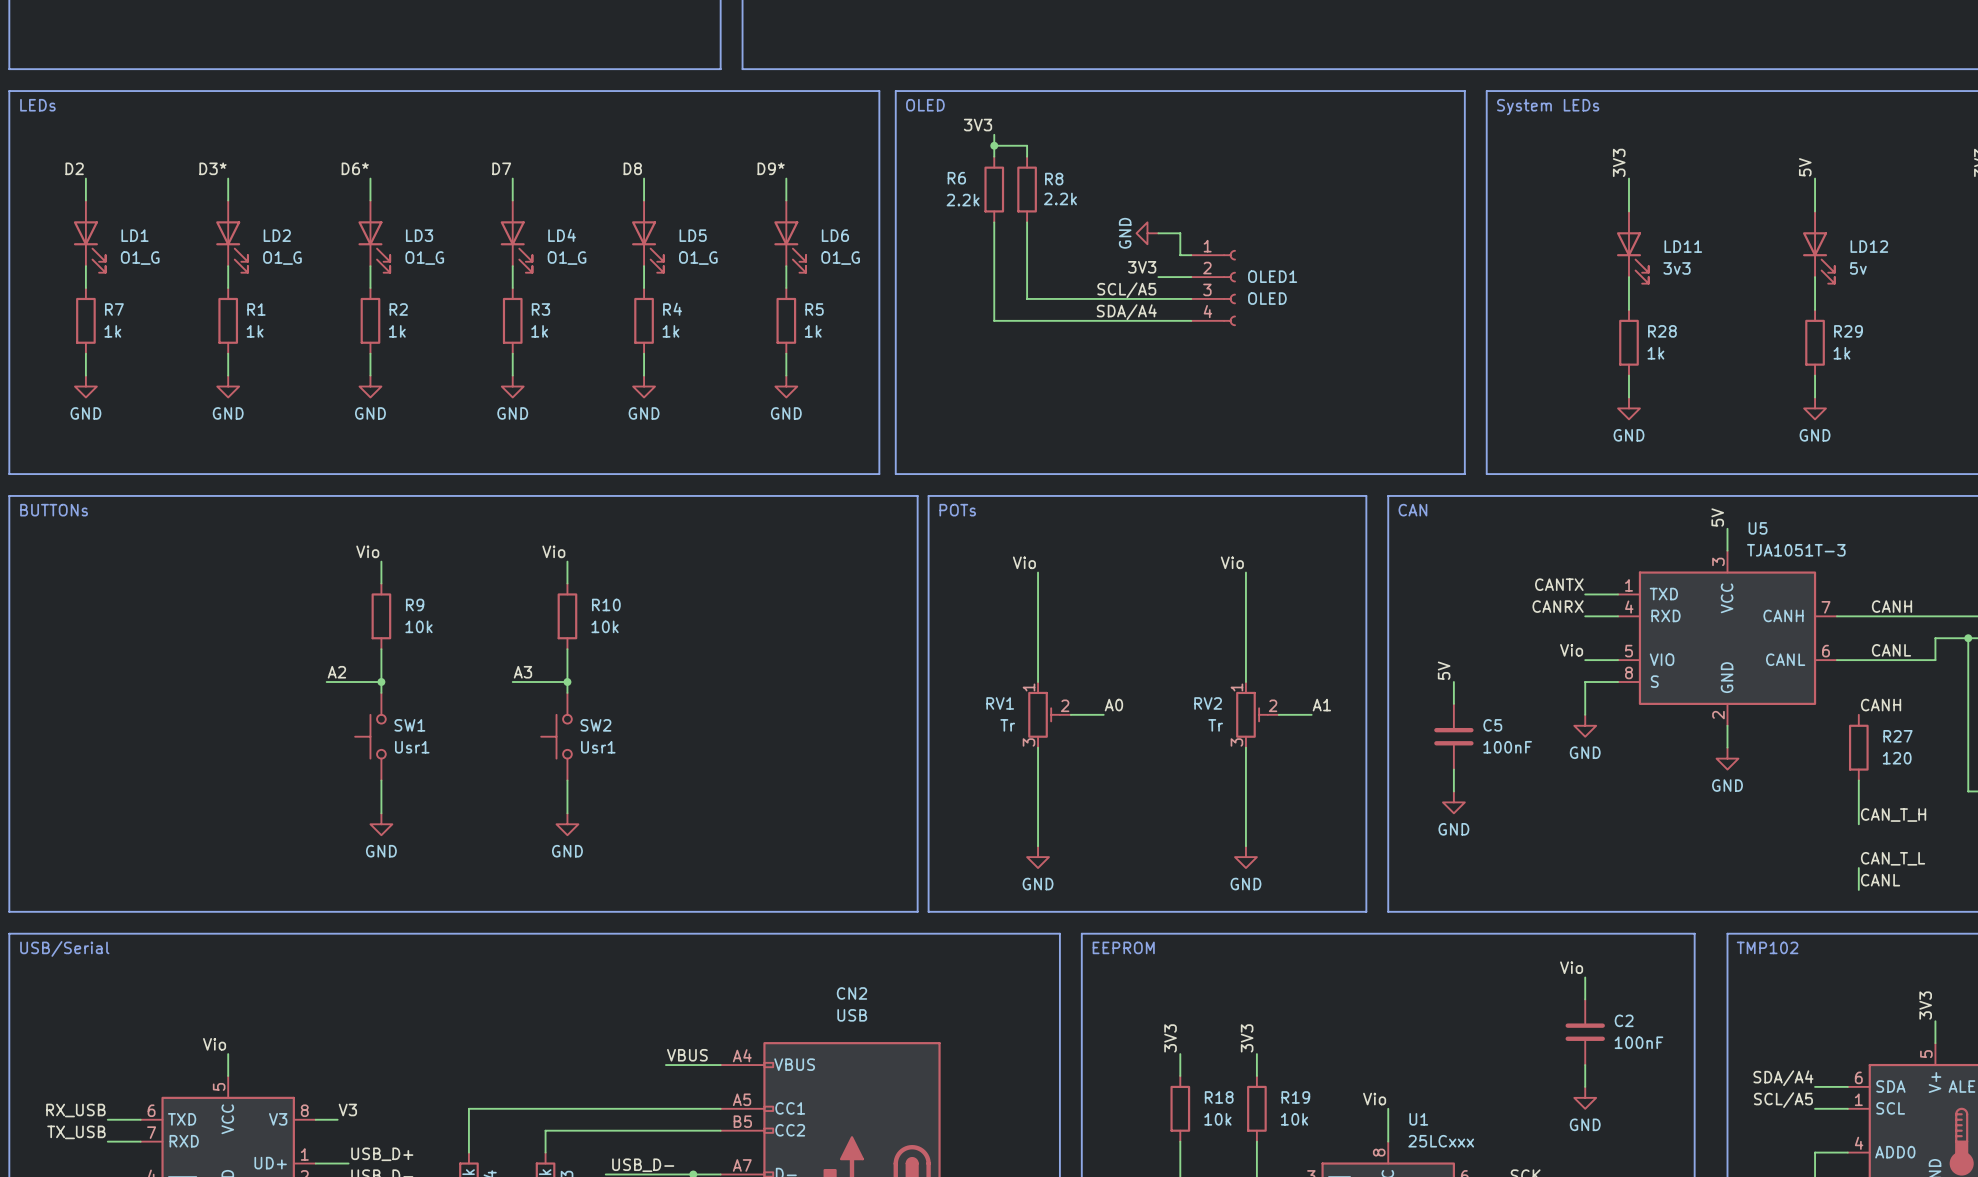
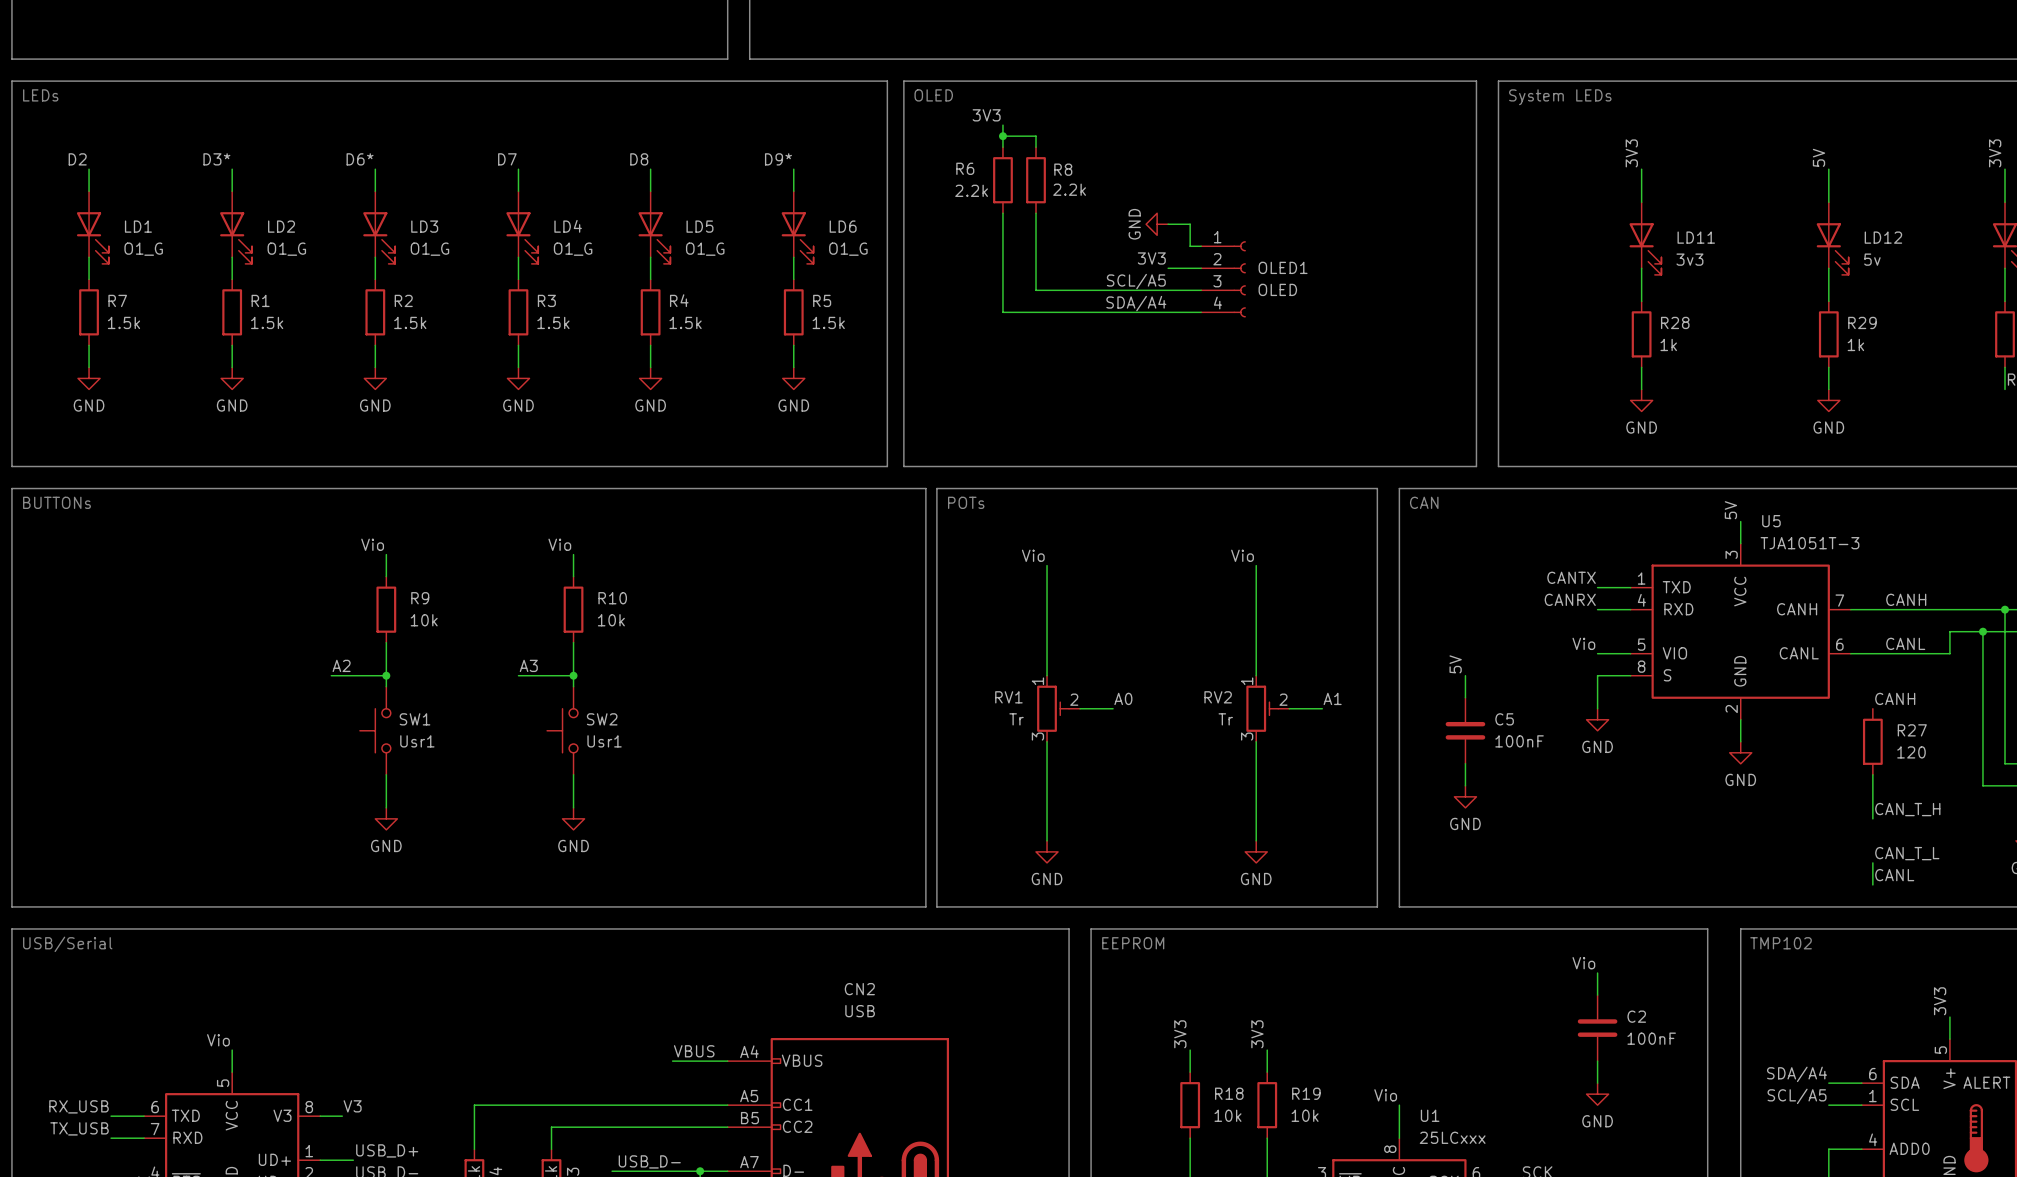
R7 value: 1k (112, 331) -> 1.5k (123, 322)
R1 value: 1k (255, 331) -> 1.5k (267, 322)
R2 value: 1k (397, 331) -> 1.5k (410, 322)
R3 value: 1k (539, 331) -> 1.5k (553, 322)
R4 value: 1k (670, 331) -> 1.5k (685, 322)
R5 value: 1k (813, 331) -> 1.5k (828, 322)

